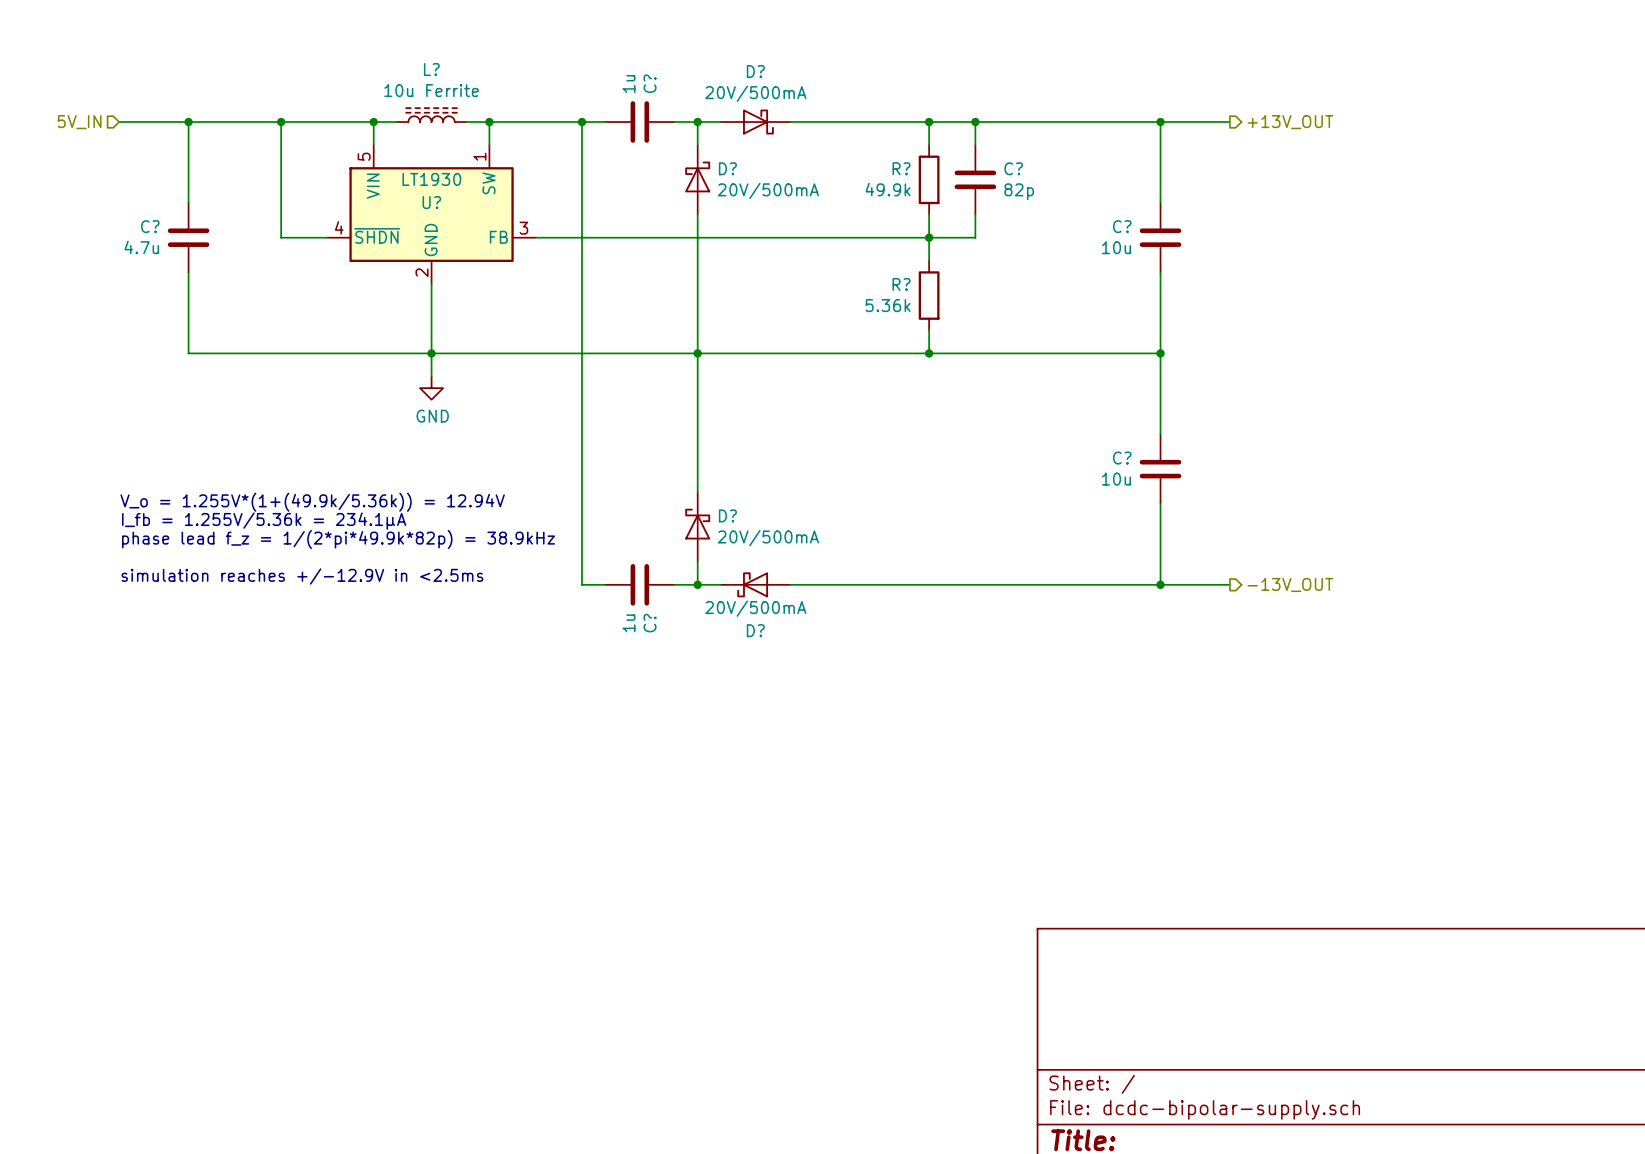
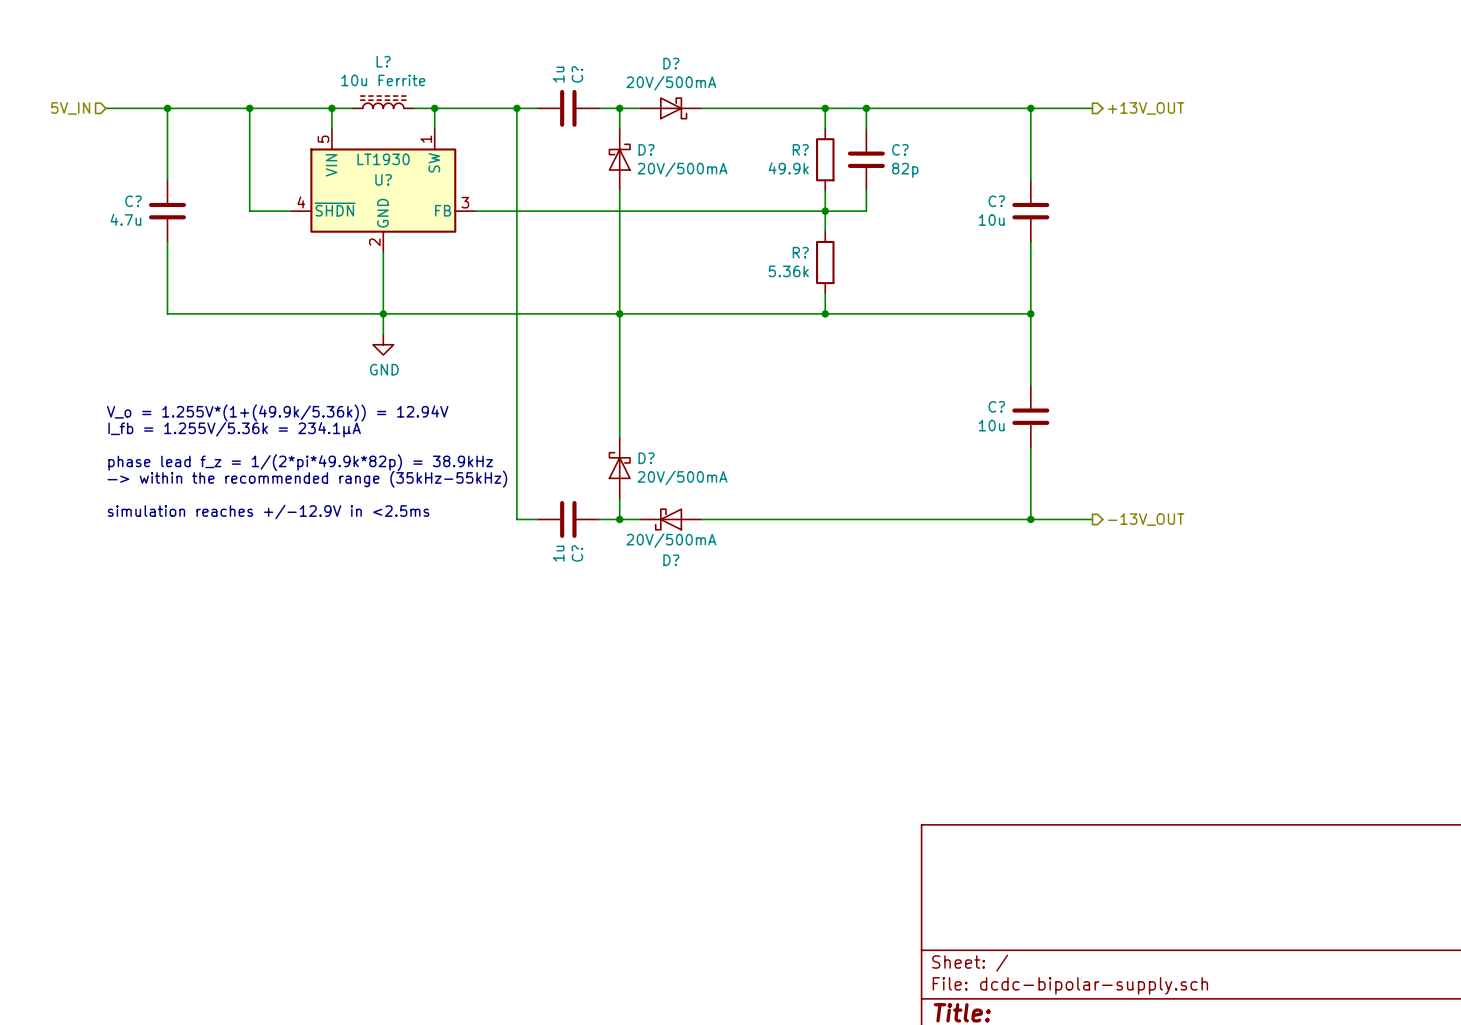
text: none -> I_fb = 1.255V/5.36k = 234.1µA (234, 429)
text position: V_o = 1.255V*(1+(49.9k/5.36k)) = 12.94V (312, 502) -> V_o = 1.255V*(1+(49.9k/5.36k)) = 12.94V (277, 412)
text: I_fb = 1.255V/5.36k = 234.1µA (264, 521) -> phase lead f_z = 1/(2*pi*49.9k*82p) = 38.9kHz (300, 462)
text: phase lead f_z = 1/(2*pi*49.9k*82p) = 38.9kHz (338, 539) -> —> within the recommended range (35kHz-55kHz) (307, 479)

